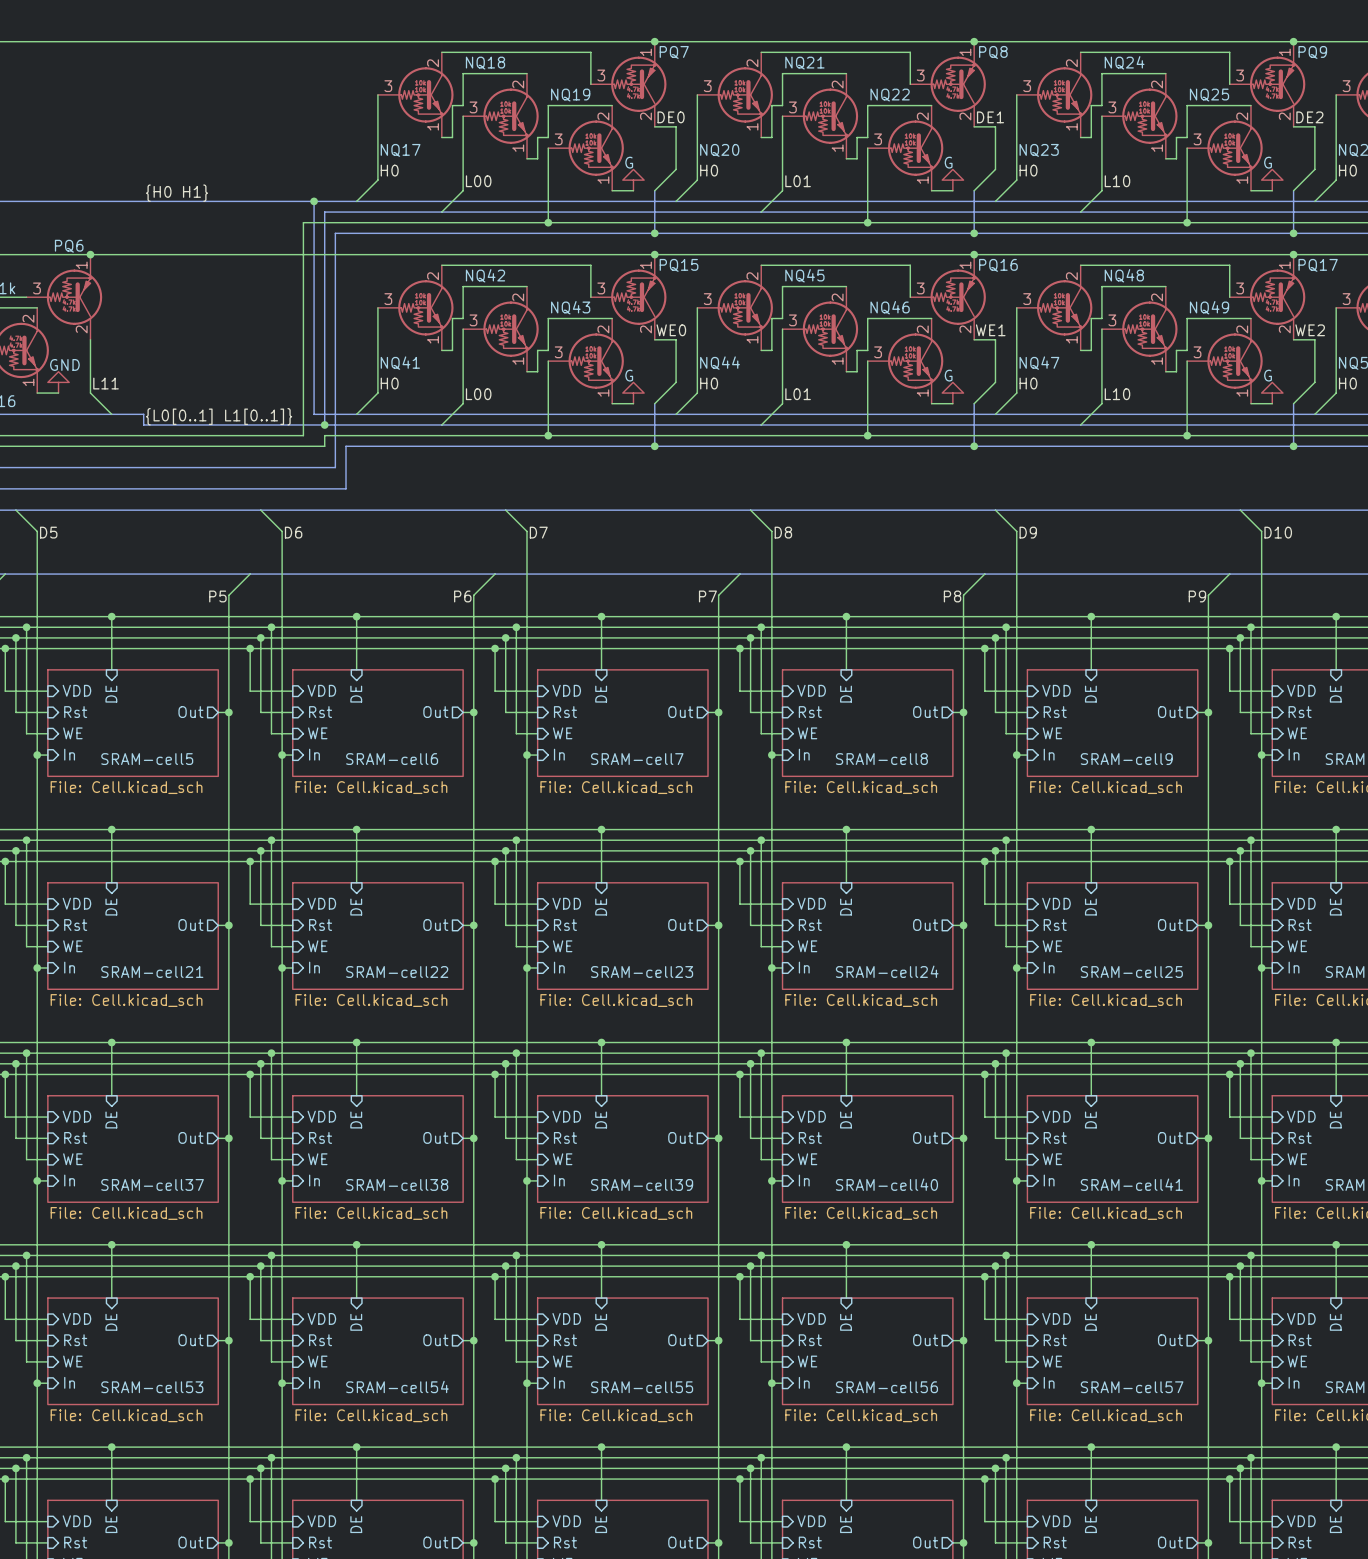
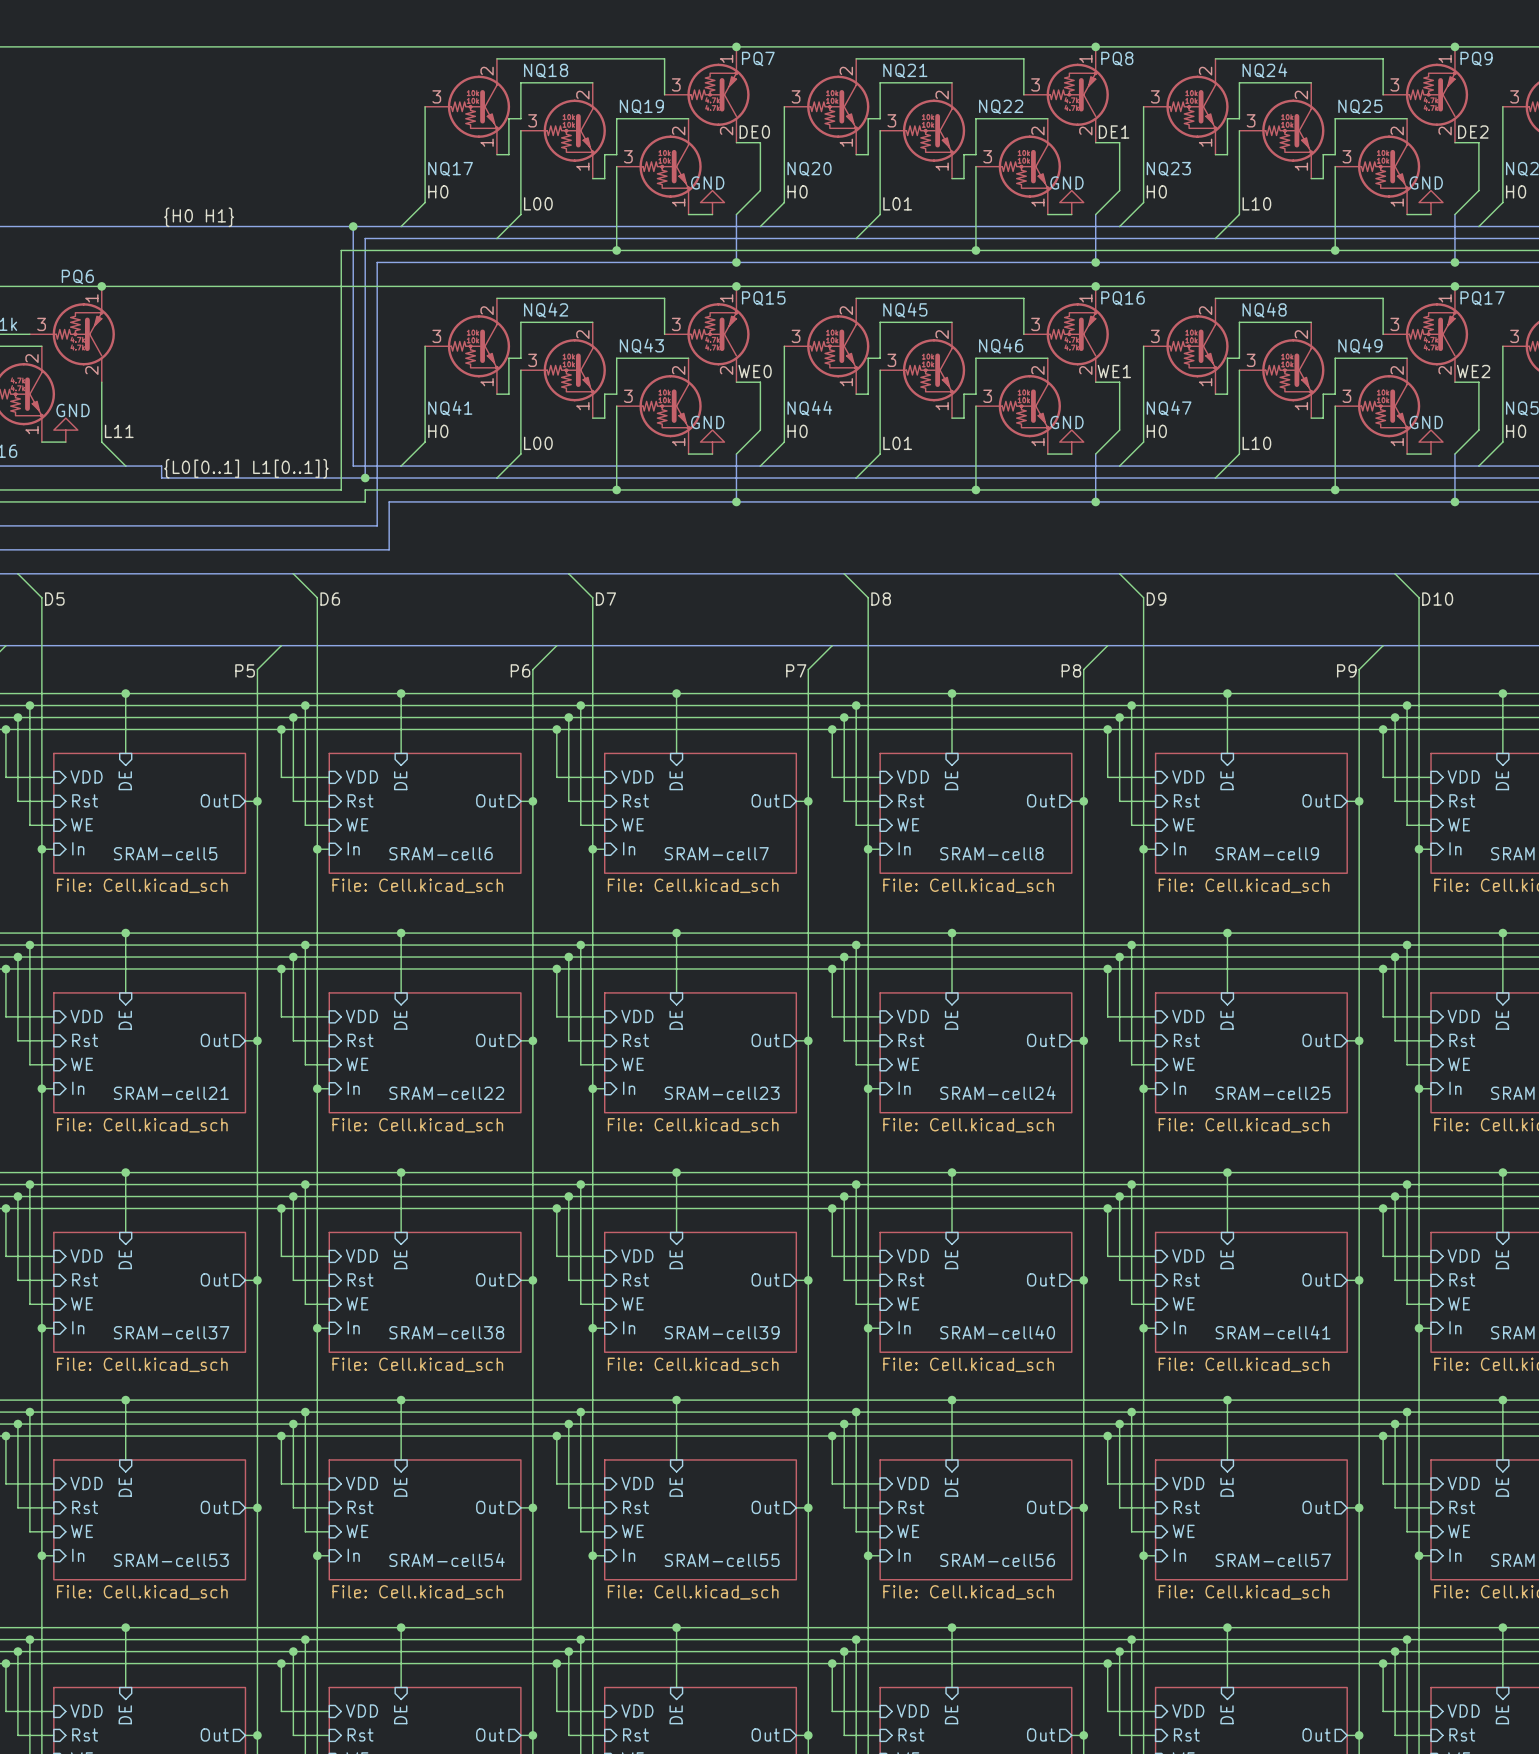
power symbol: G (633, 180) -> GND (712, 202)
power symbol: G (952, 180) -> GND (1071, 202)
power symbol: G (1272, 180) -> GND (1431, 202)
power symbol: G (633, 393) -> GND (712, 442)
power symbol: G (952, 393) -> GND (1071, 442)
power symbol: G (1272, 393) -> GND (1431, 442)

